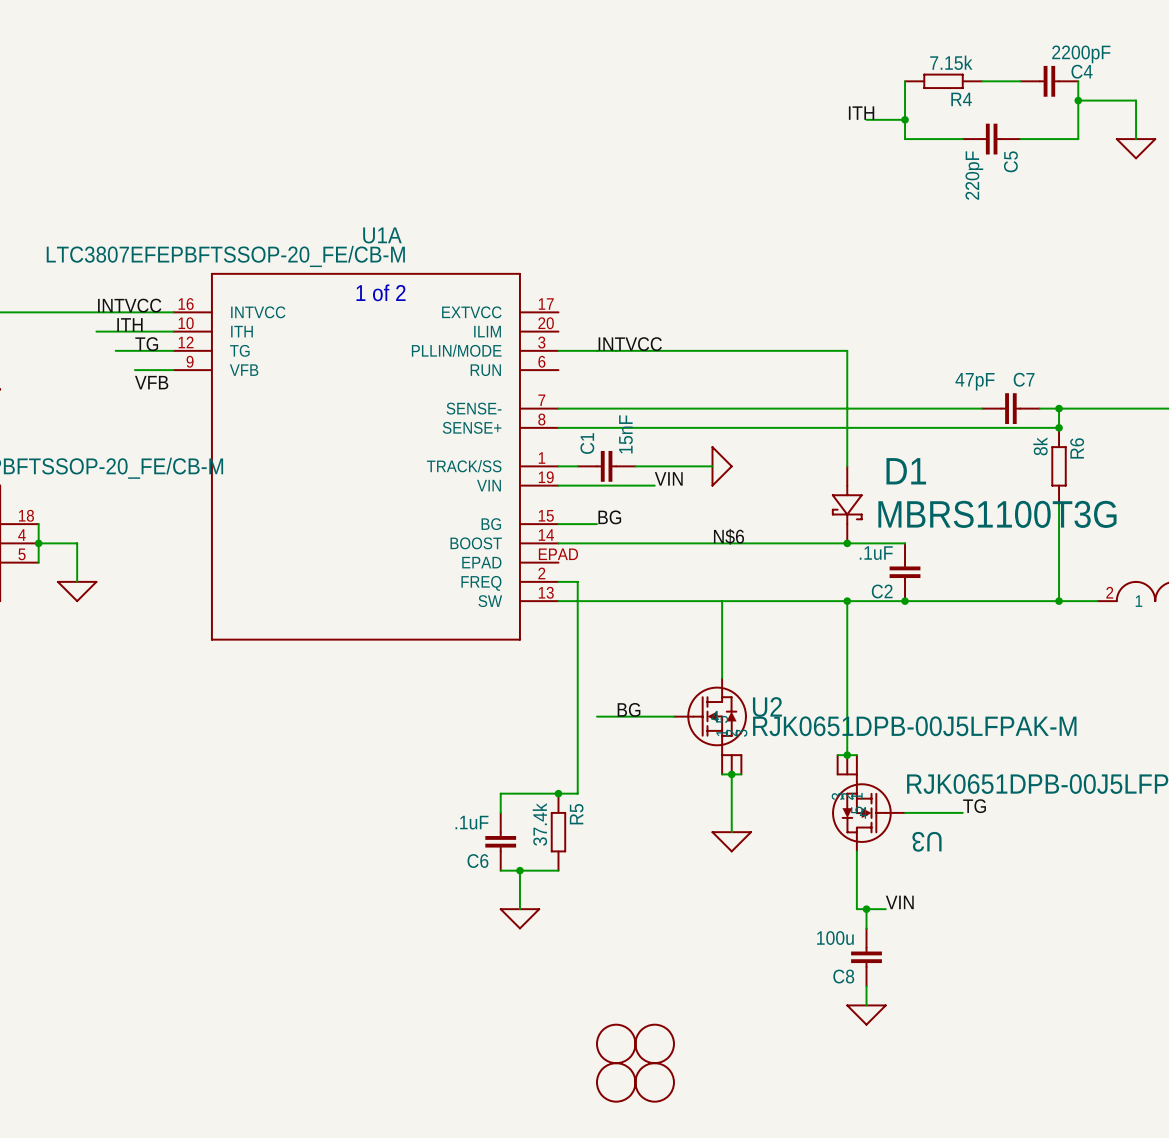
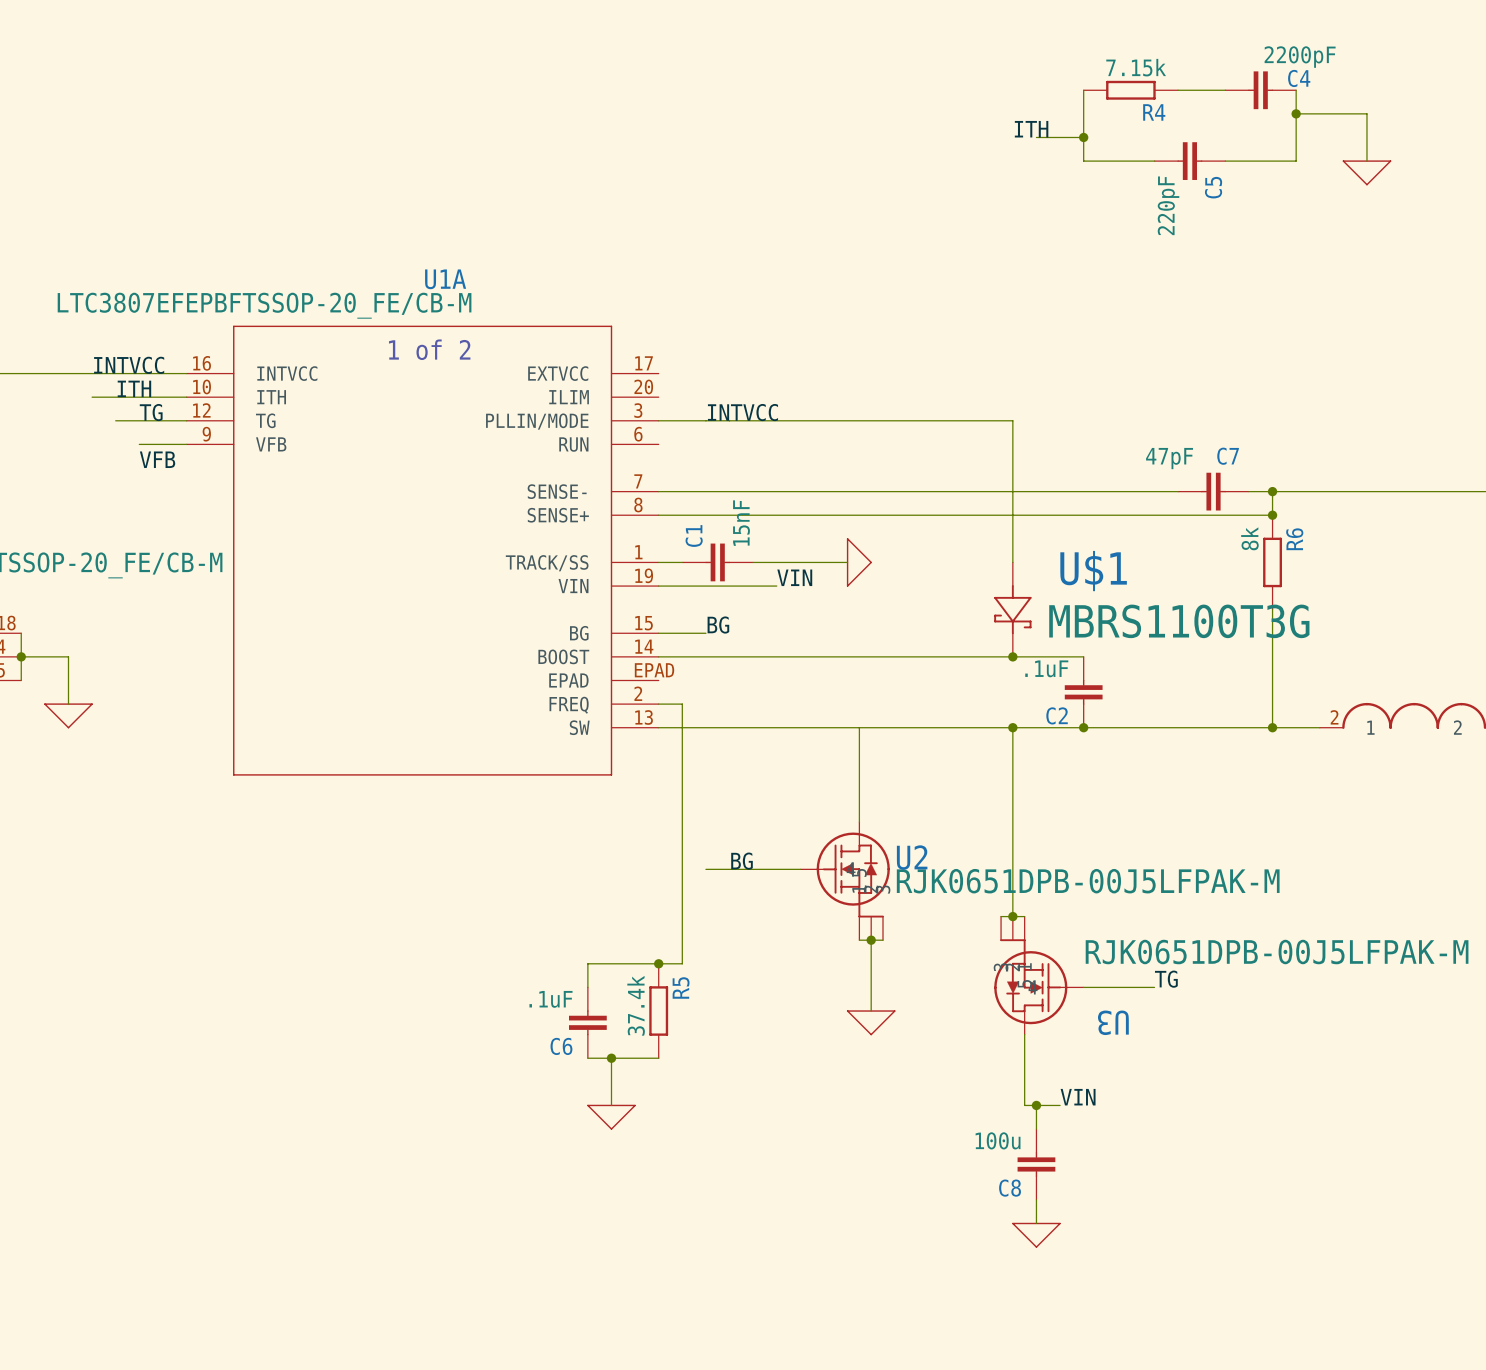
D1 name: D1 (906, 471) -> U$1 (1093, 571)
label: N$6 (729, 536) -> none
part: (635, 1063) -> none

